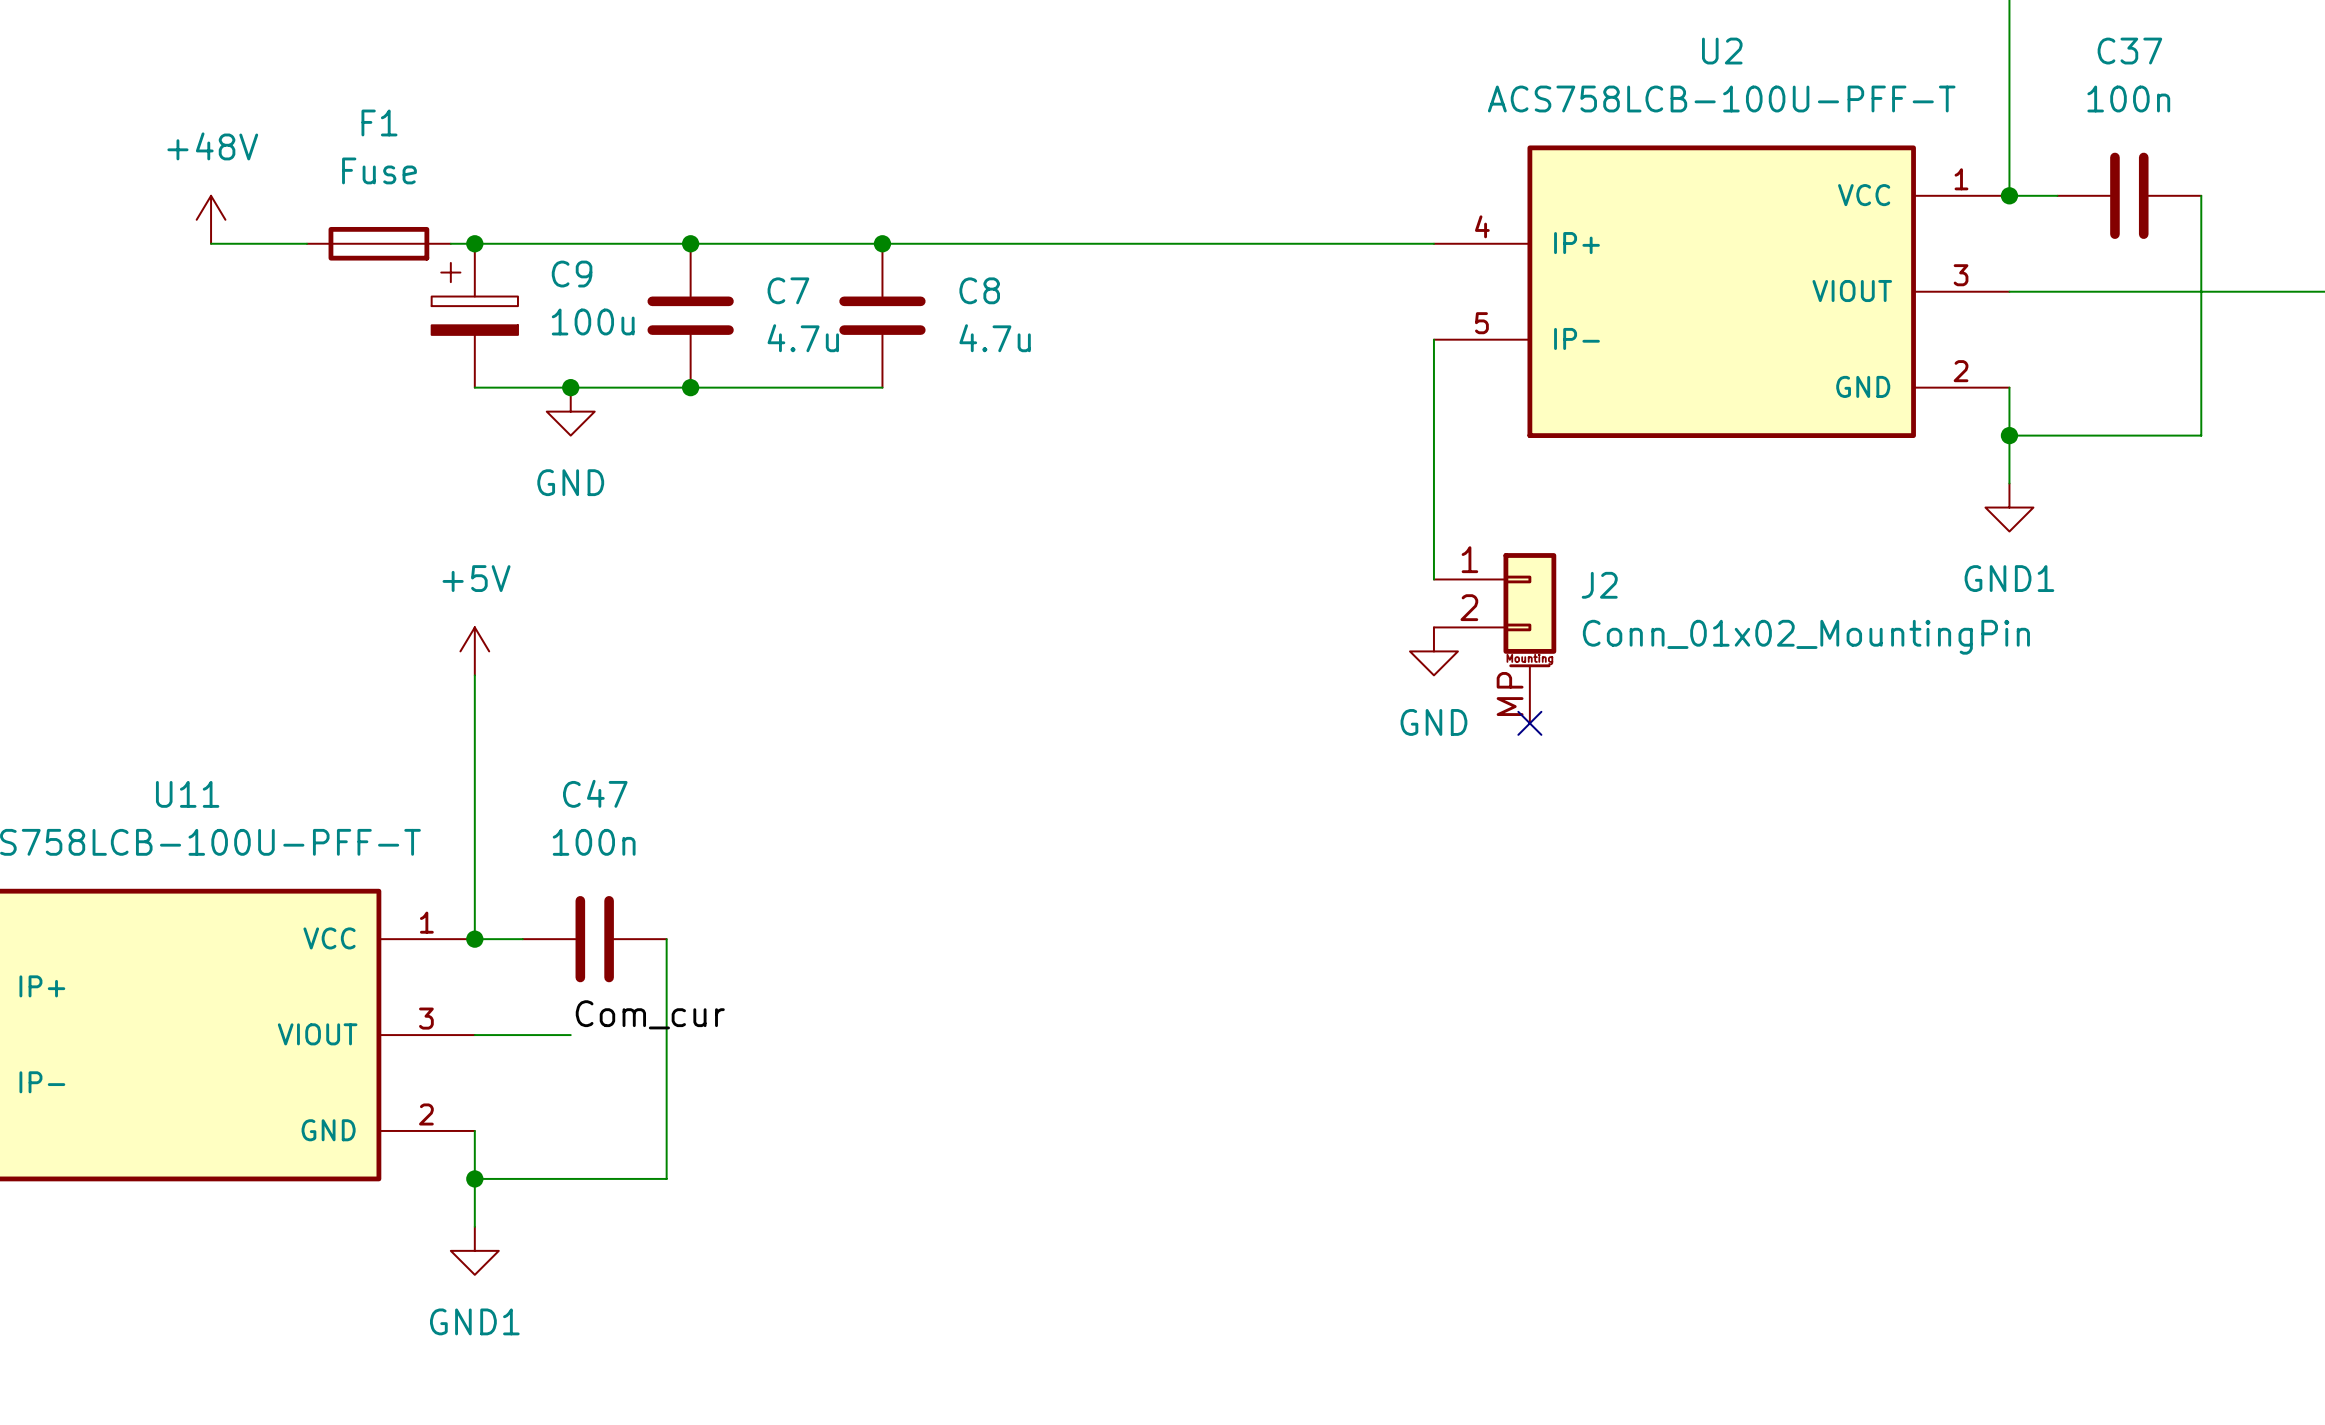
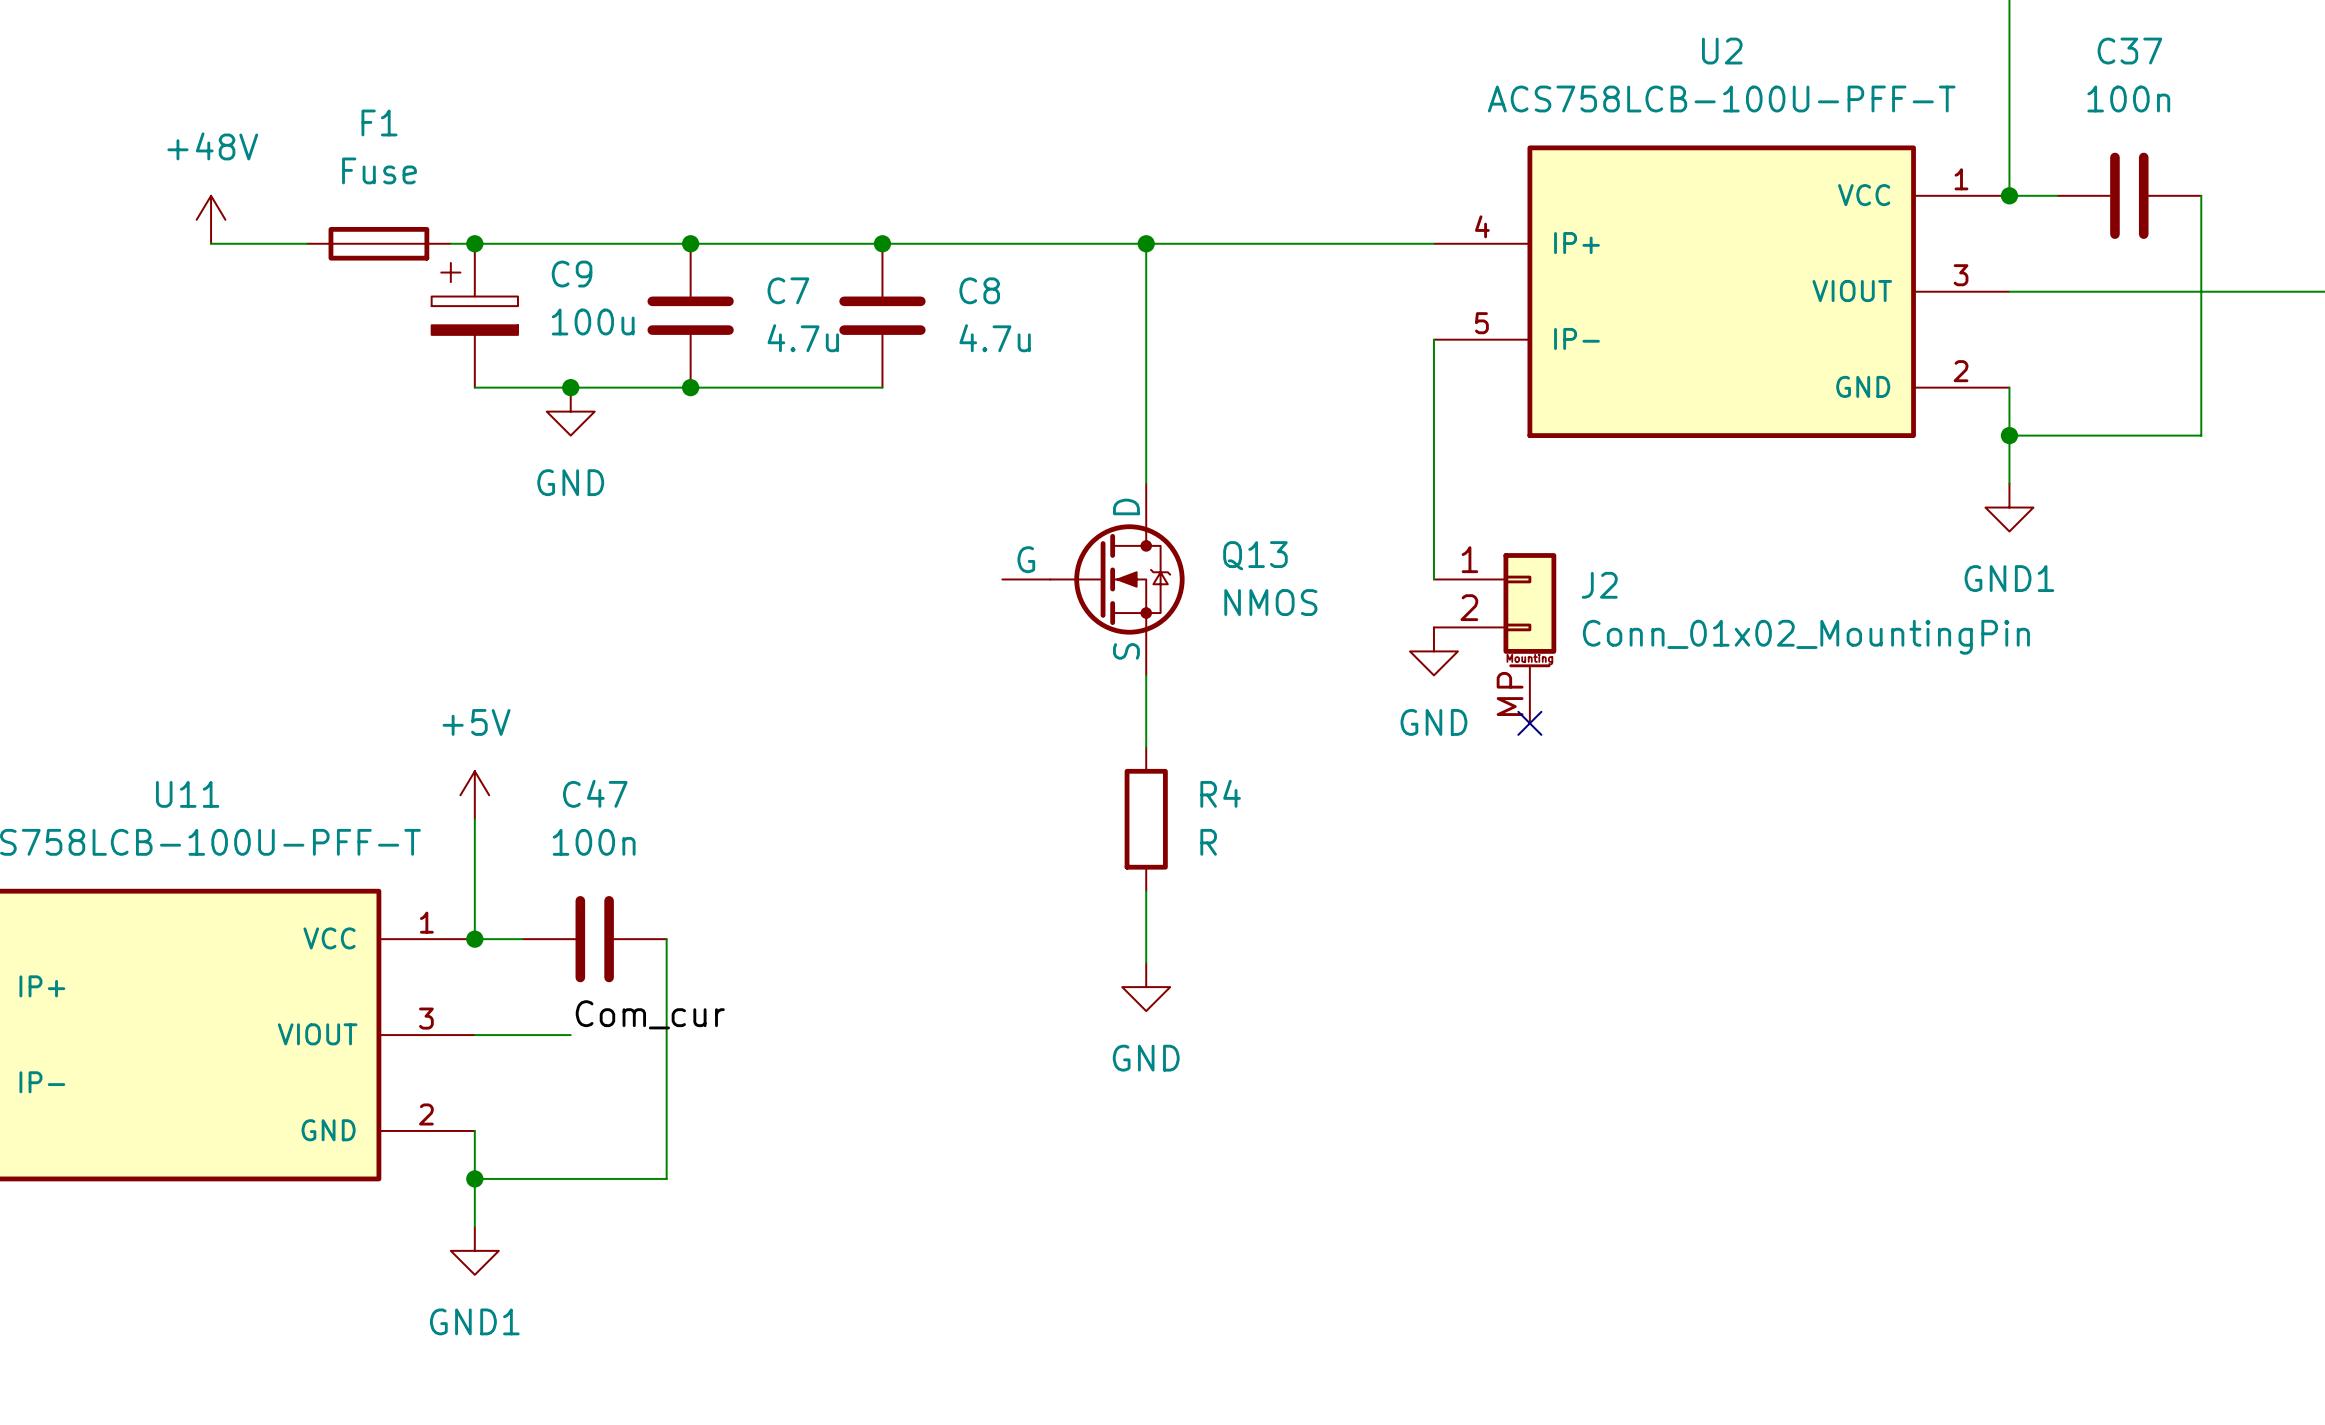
wire: none -> (1146, 243) (1146, 483)
junction: none -> (1146, 243)
Q13: none -> NMOS (1093, 579)
power symbol position: +5V (474, 651) -> +5V (474, 795)
wire: (474, 675) (474, 819) -> none
wire: none -> (1146, 675) (1146, 747)
R4: none -> R (1146, 819)
wire: none -> (1146, 891) (1146, 963)
power symbol: none -> GND (1146, 987)

